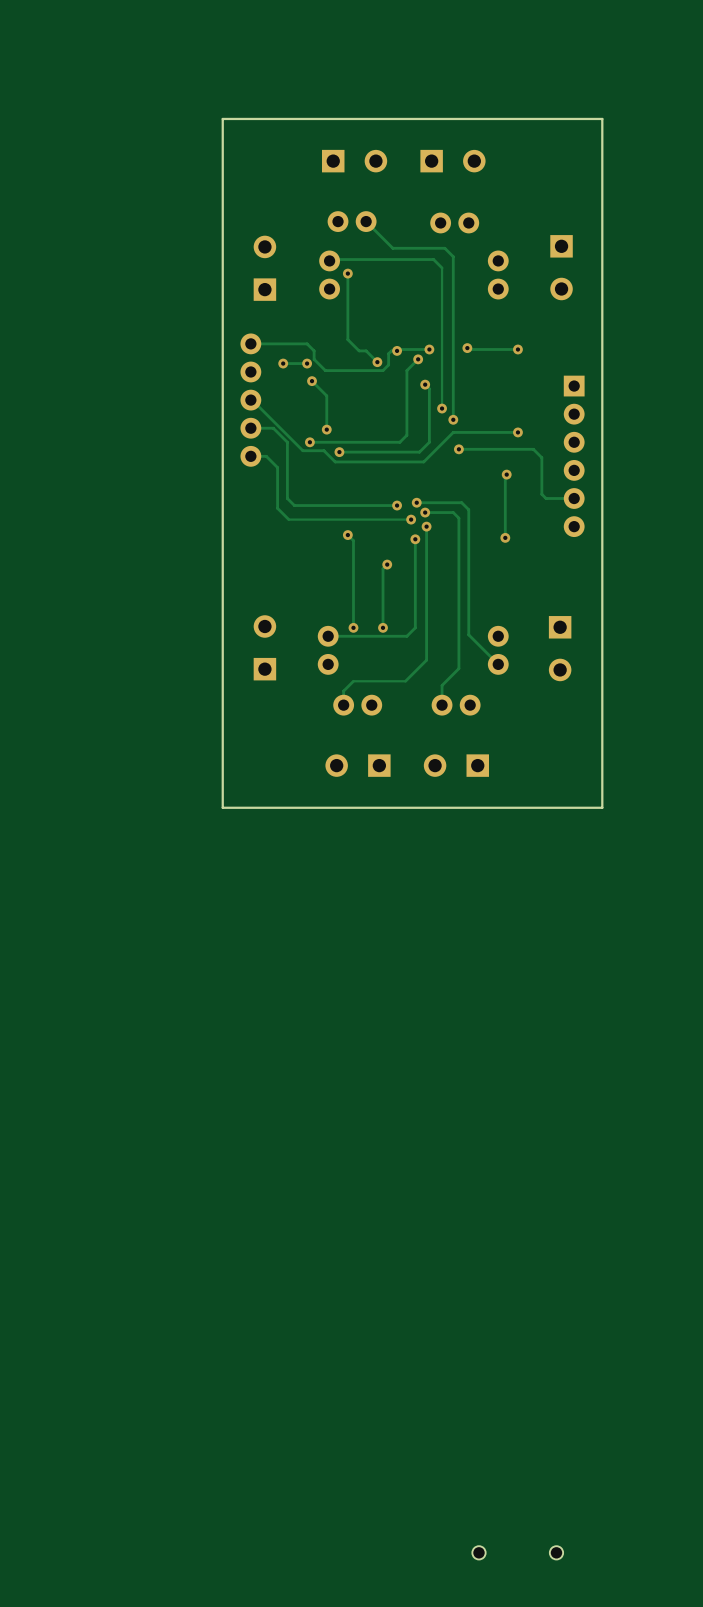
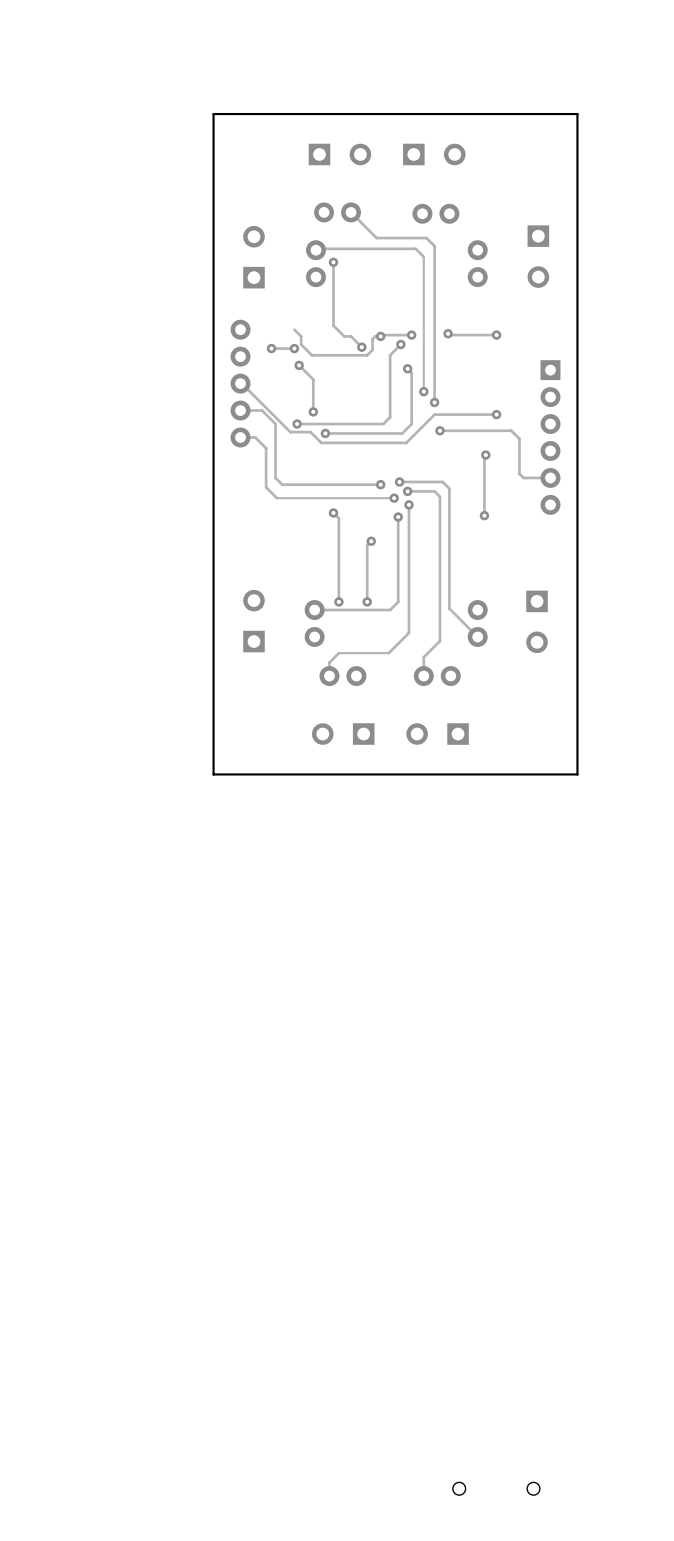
track: (307, 343) (250, 343) -> none

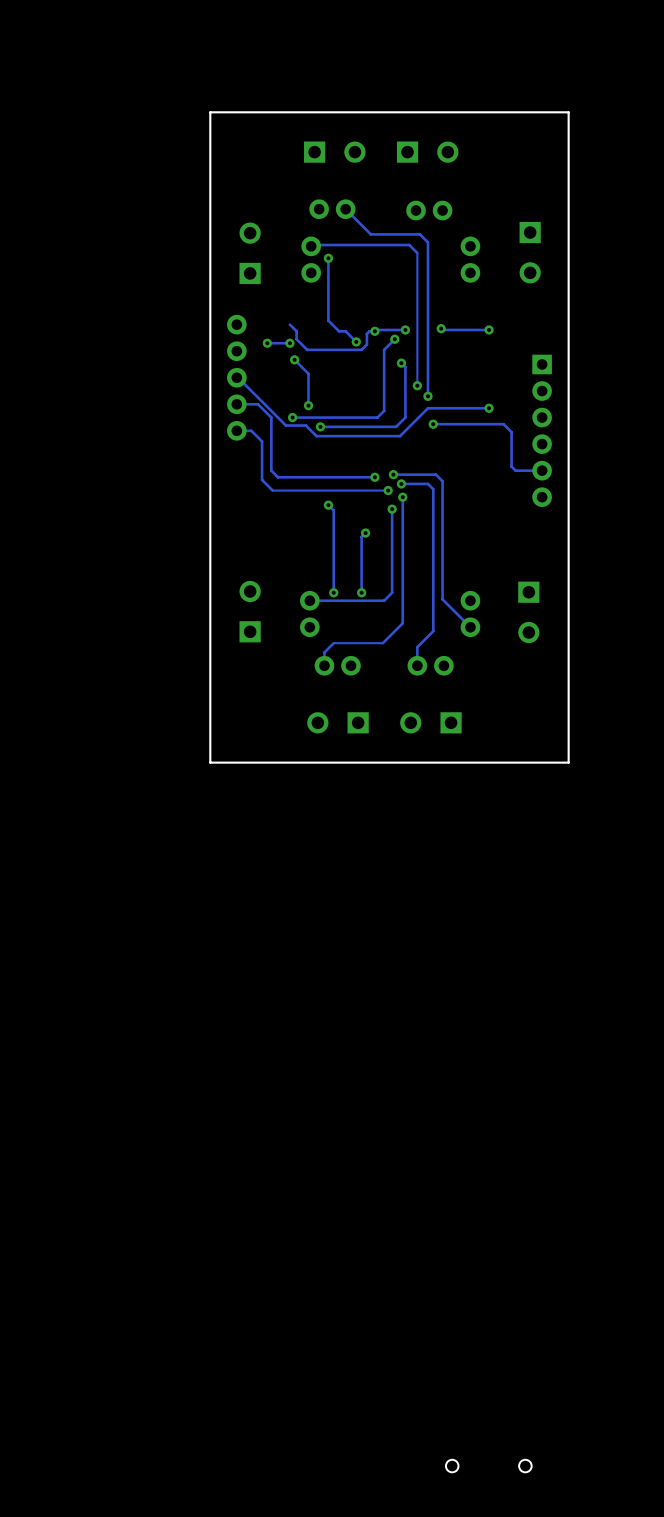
track: (485, 455) (484, 515) -> none
via: (485, 455) -> none
via: (484, 515) -> none

